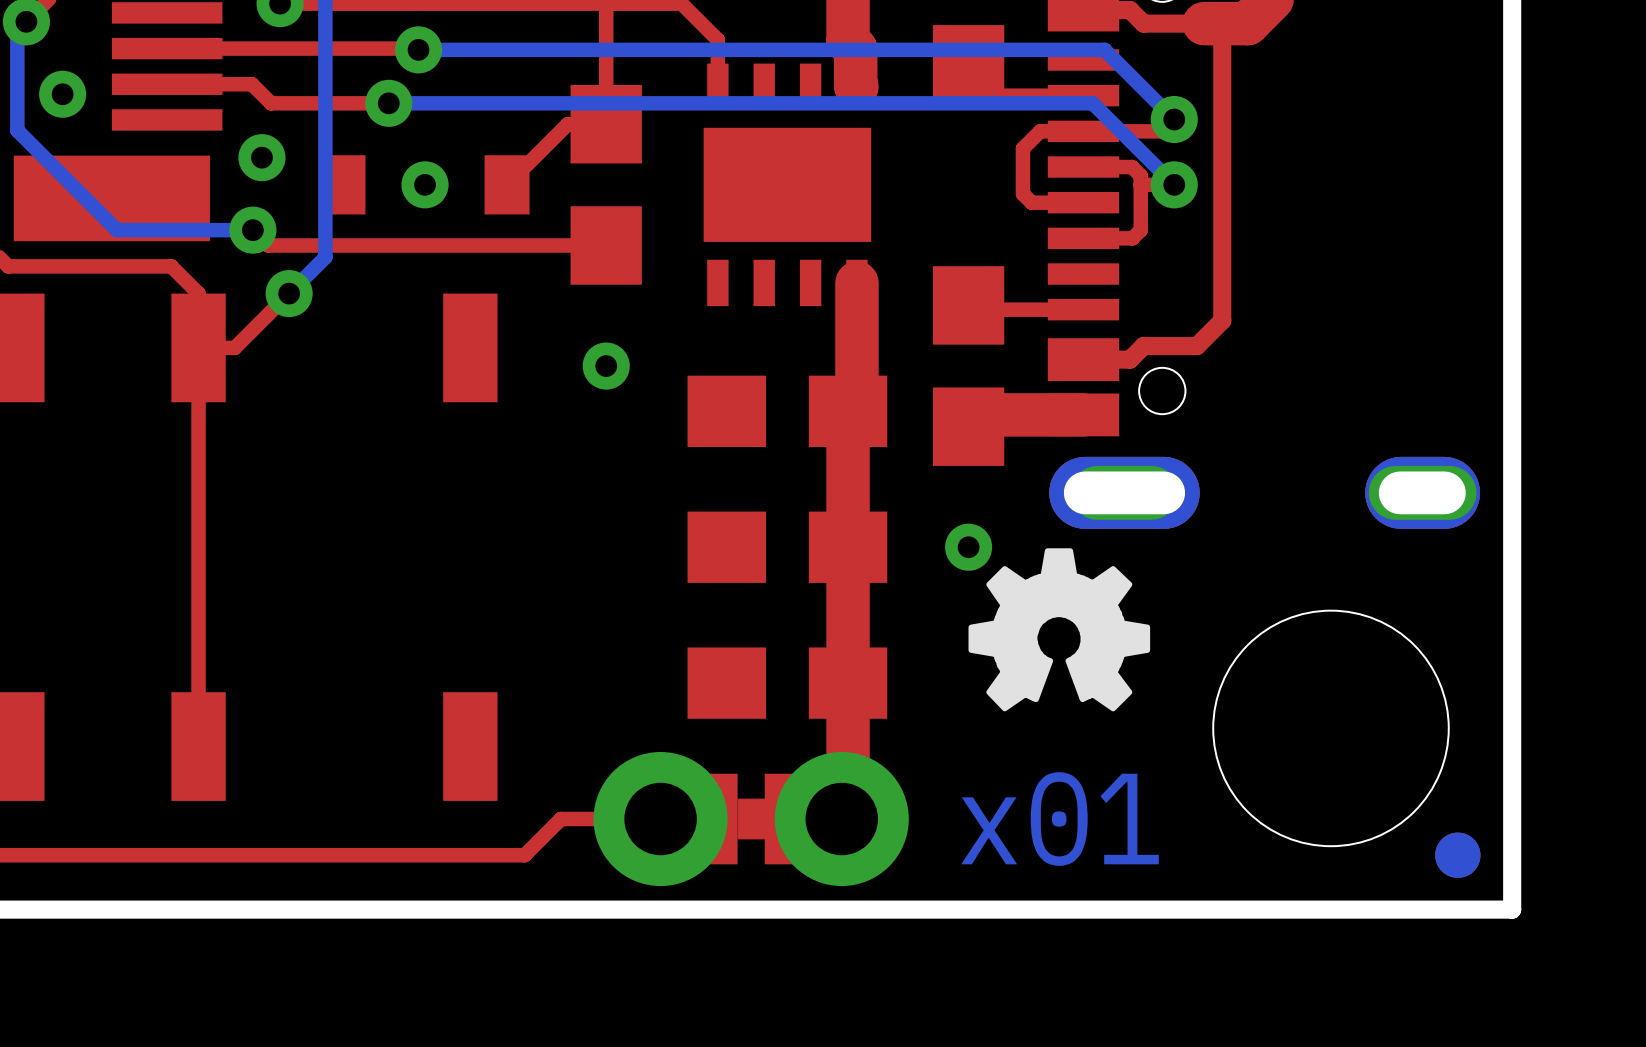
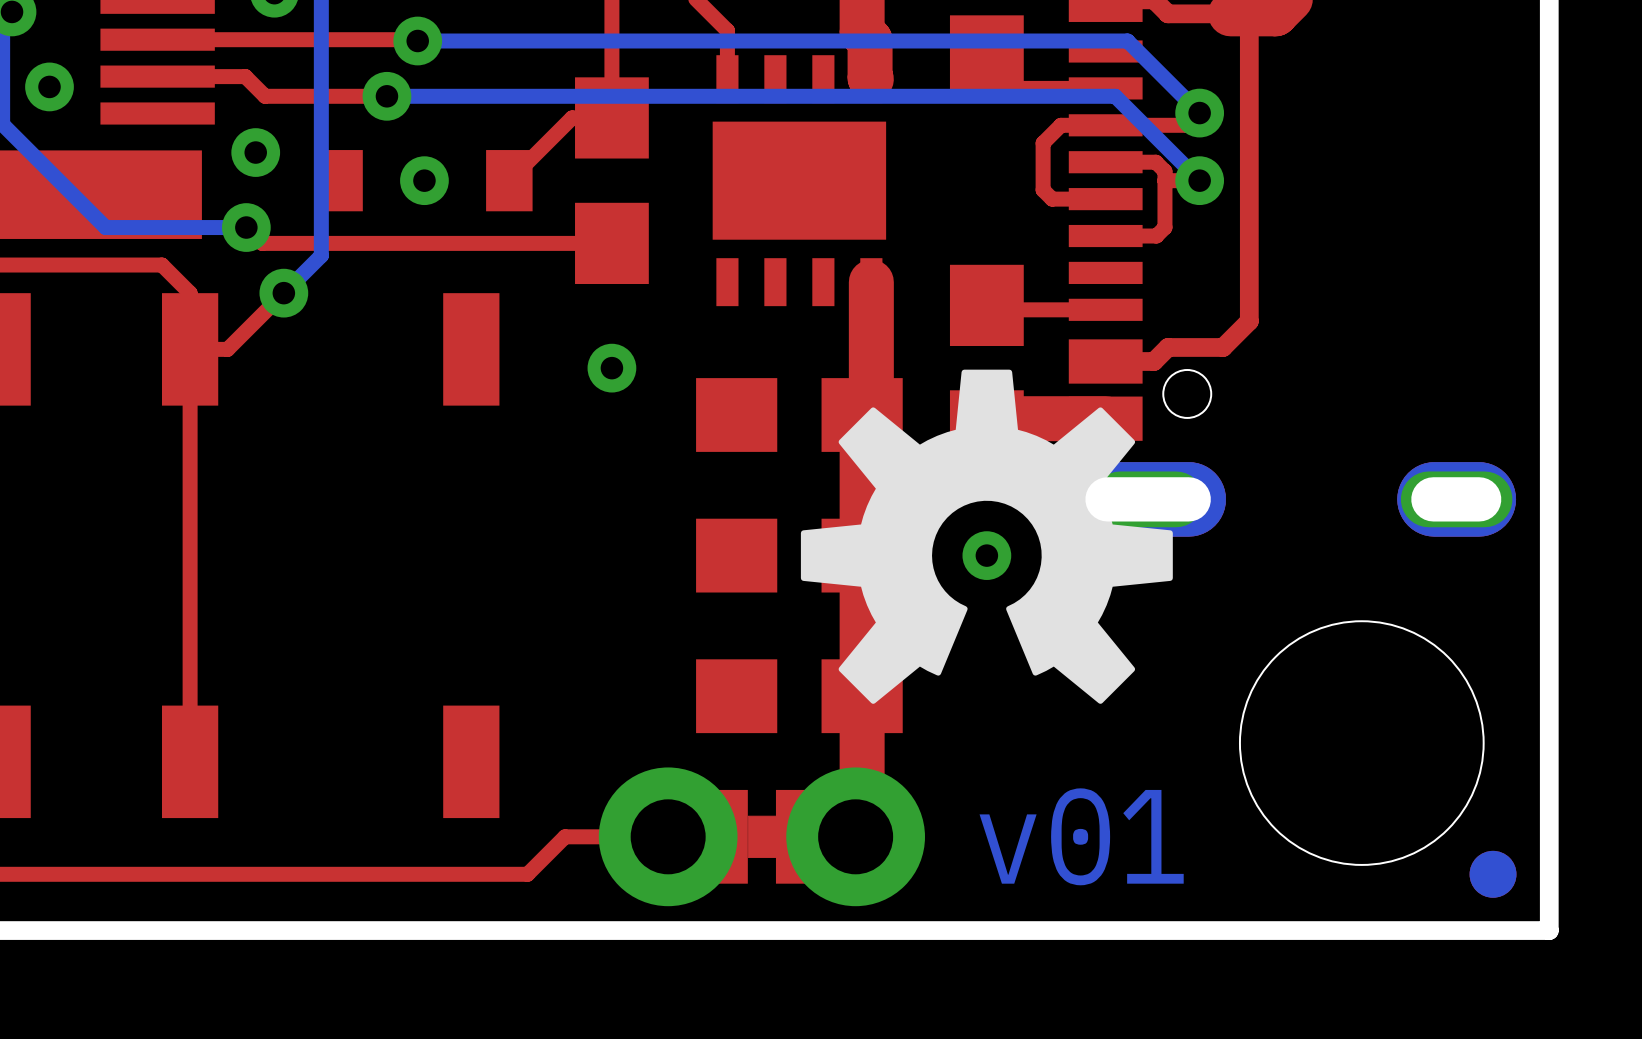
drawing: none -> [800, 369, 1173, 704]
drawing: [968, 548, 1151, 712] -> none
text: x01 (1060, 819) -> v01 (1081, 836)

